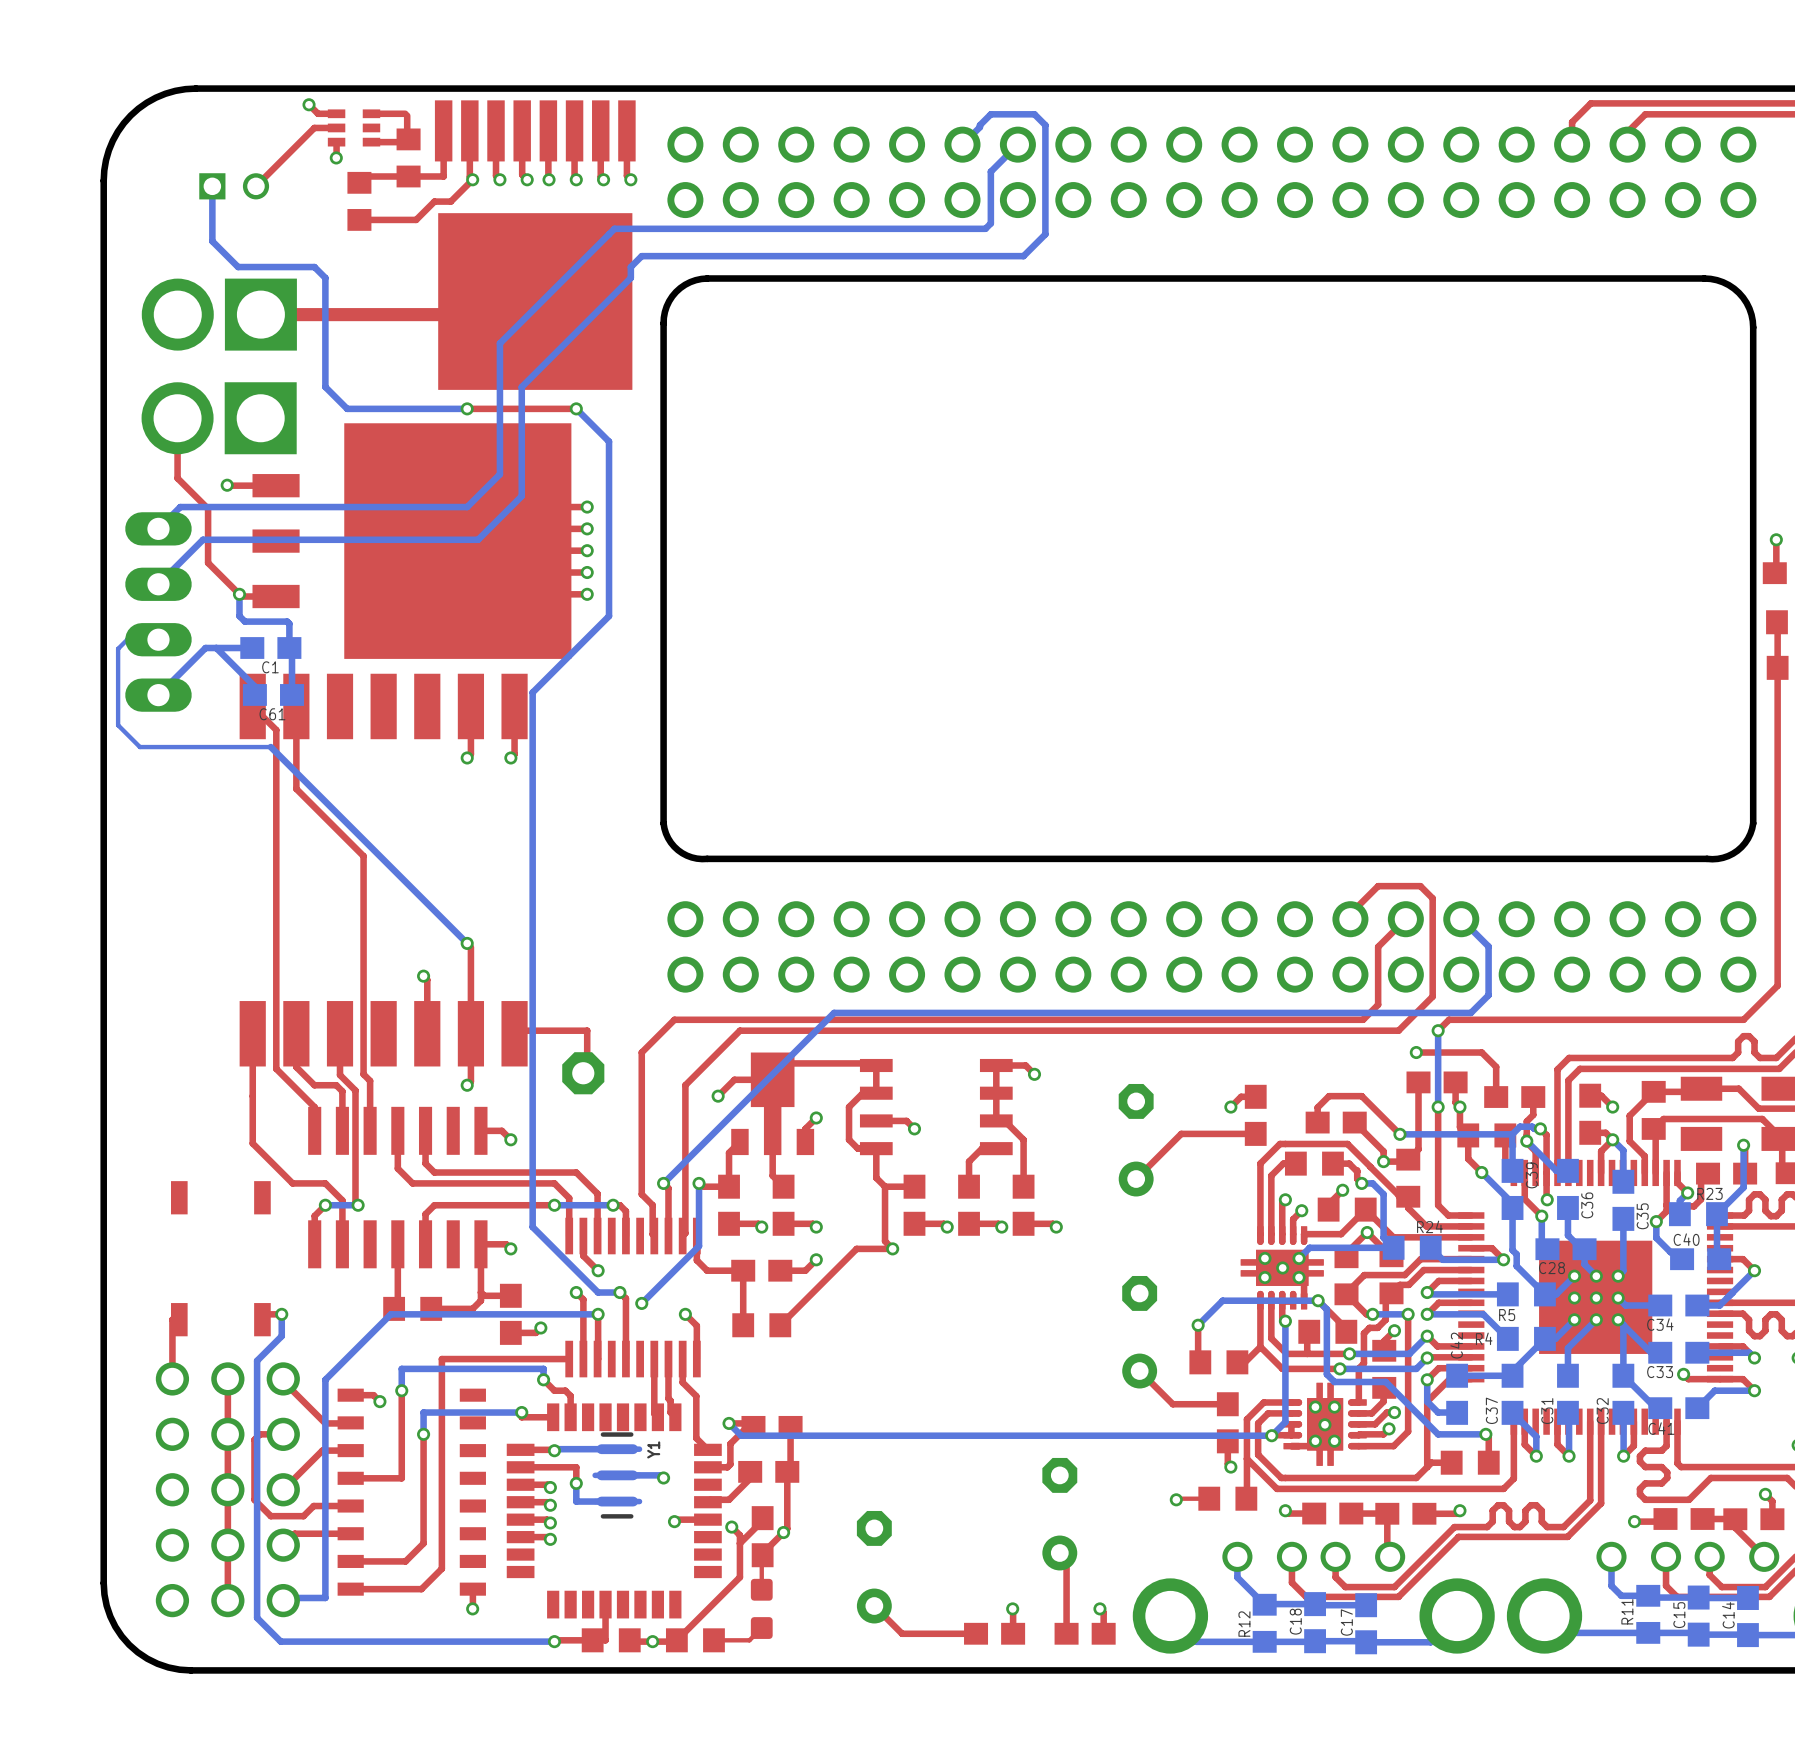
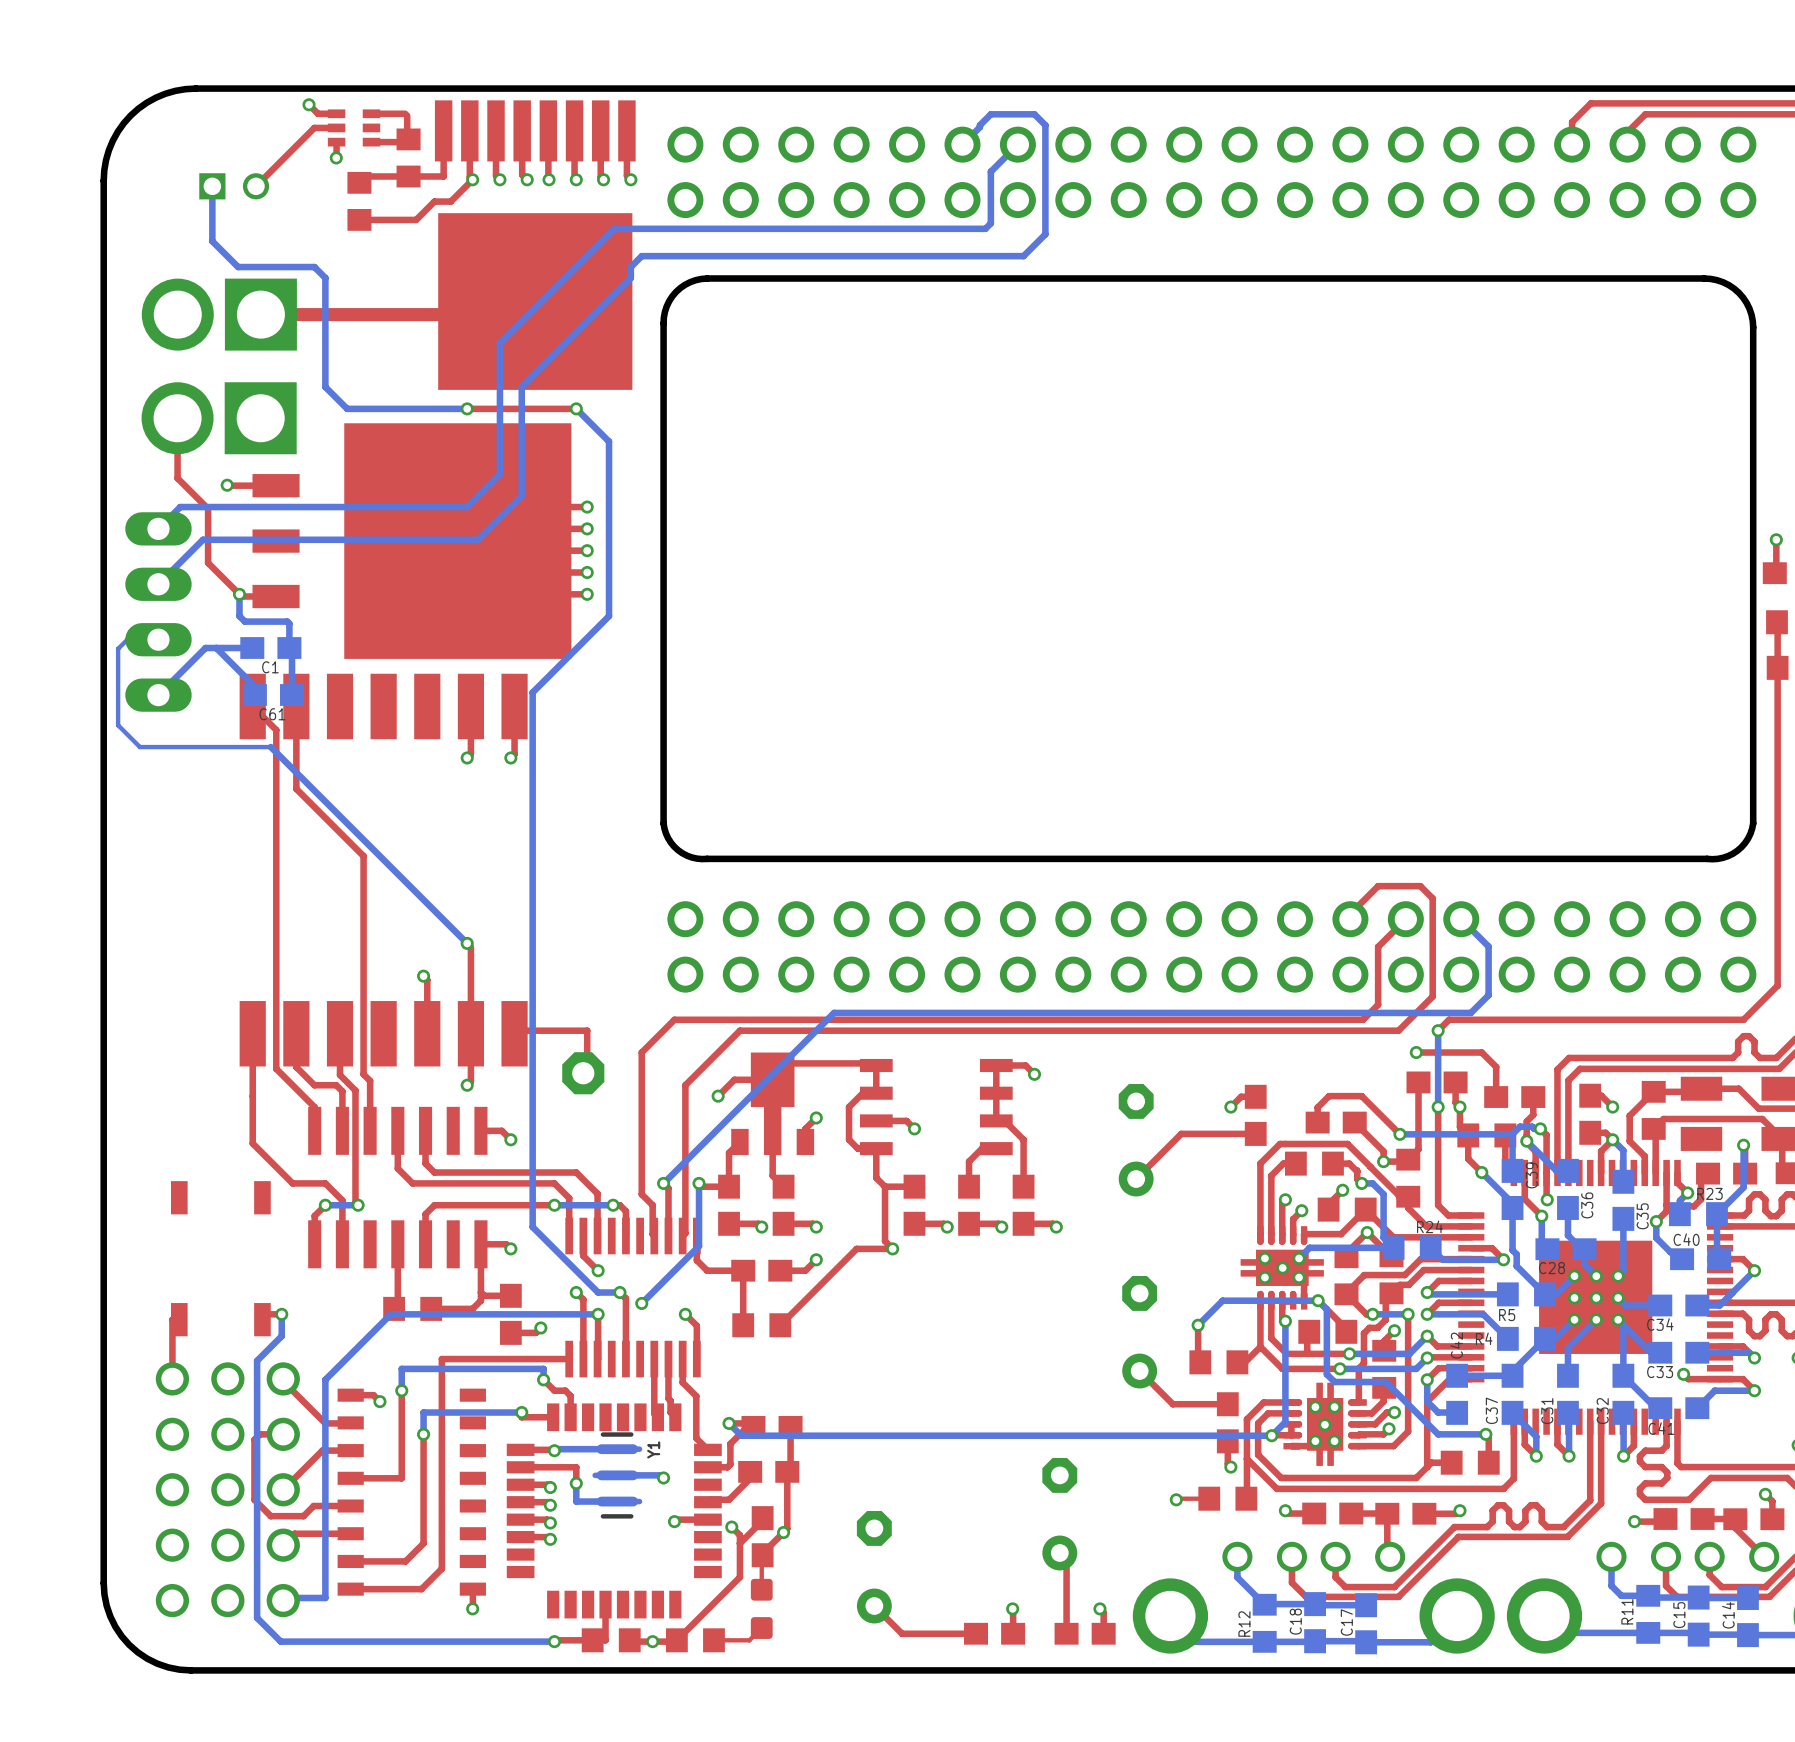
top track: (227, 1378) (227, 1600) -> none

